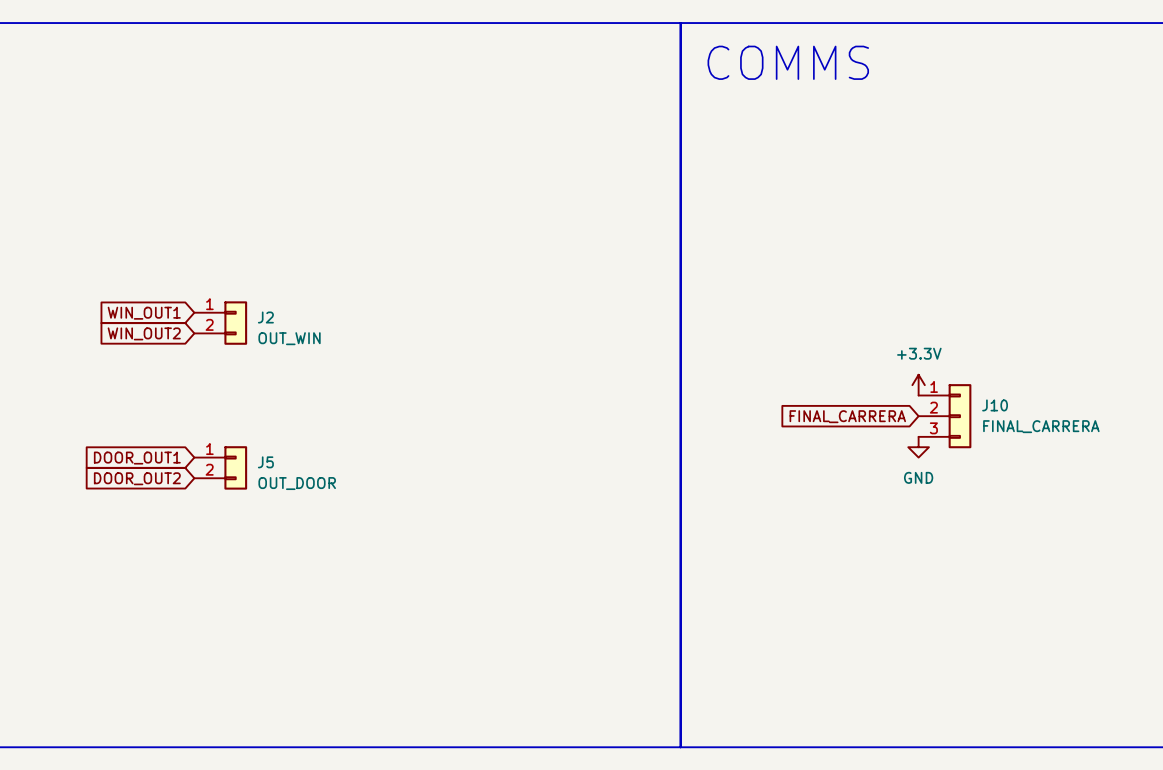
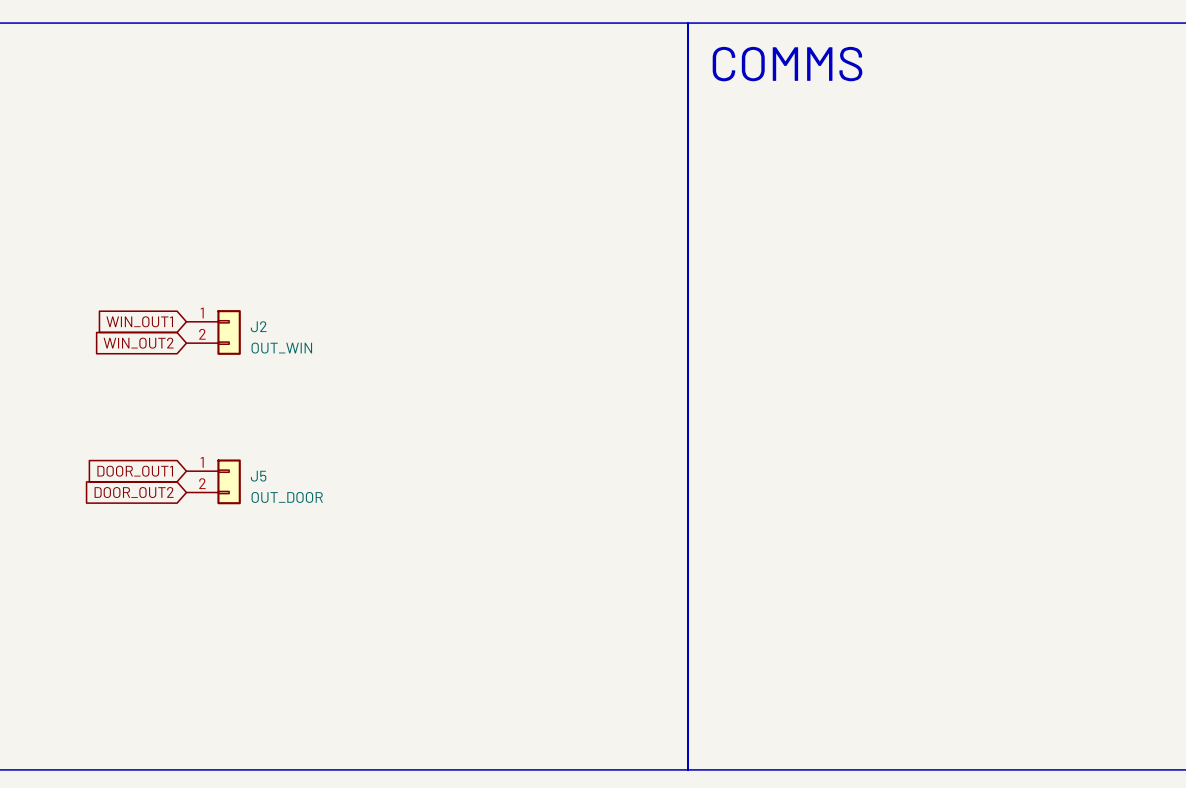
power symbol: +3.3V (918, 385) -> none
global label: FINAL_CARRERA (847, 416) -> none
J10: FINAL_CARRERA (945, 416) -> none
power symbol: GND (918, 447) -> none

